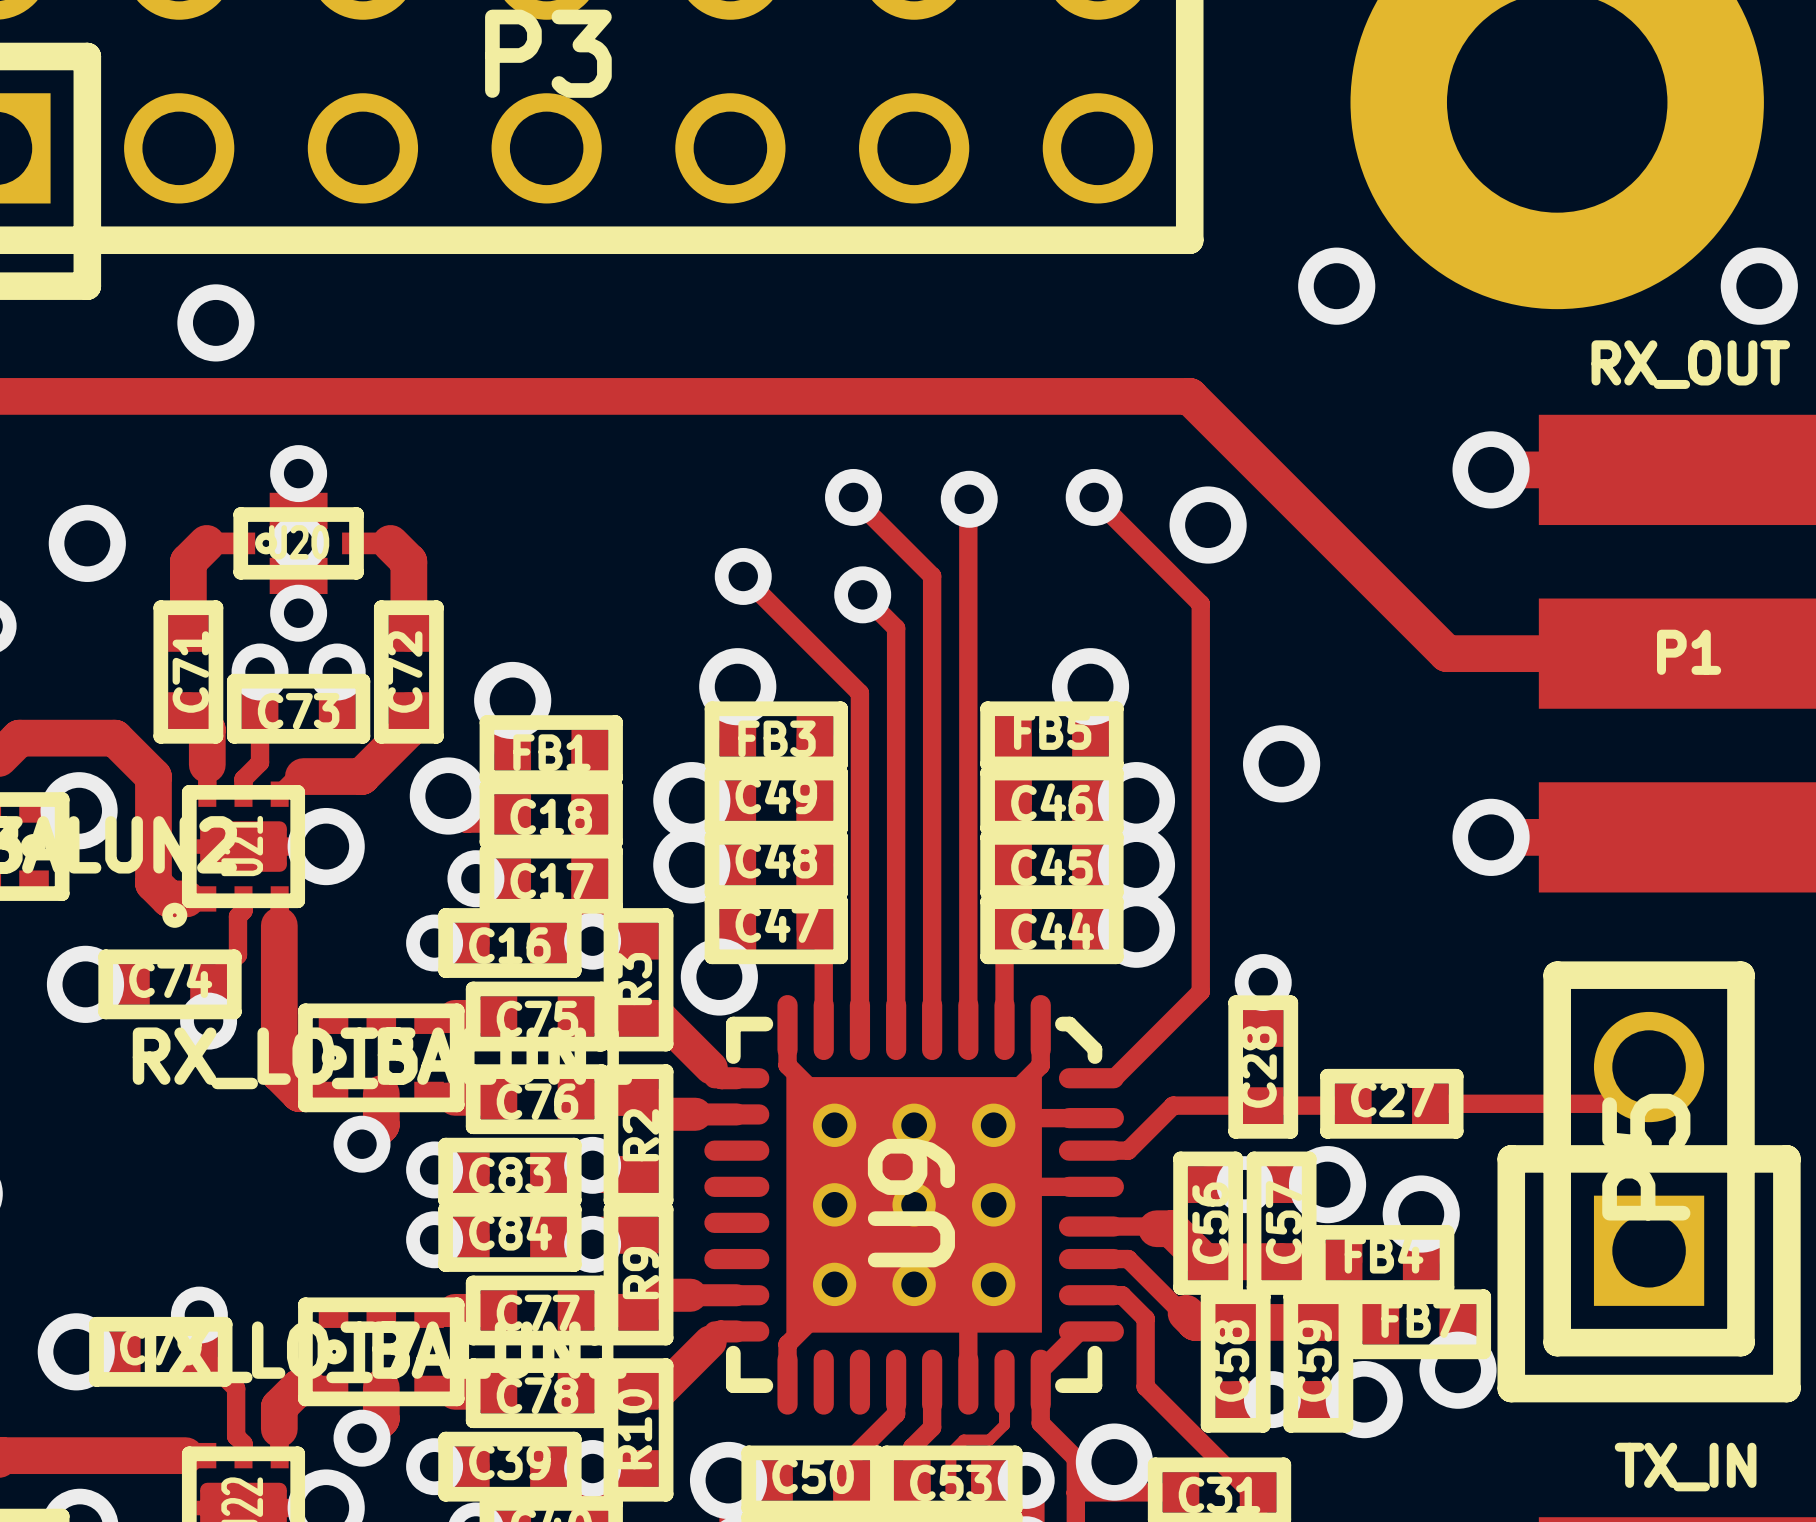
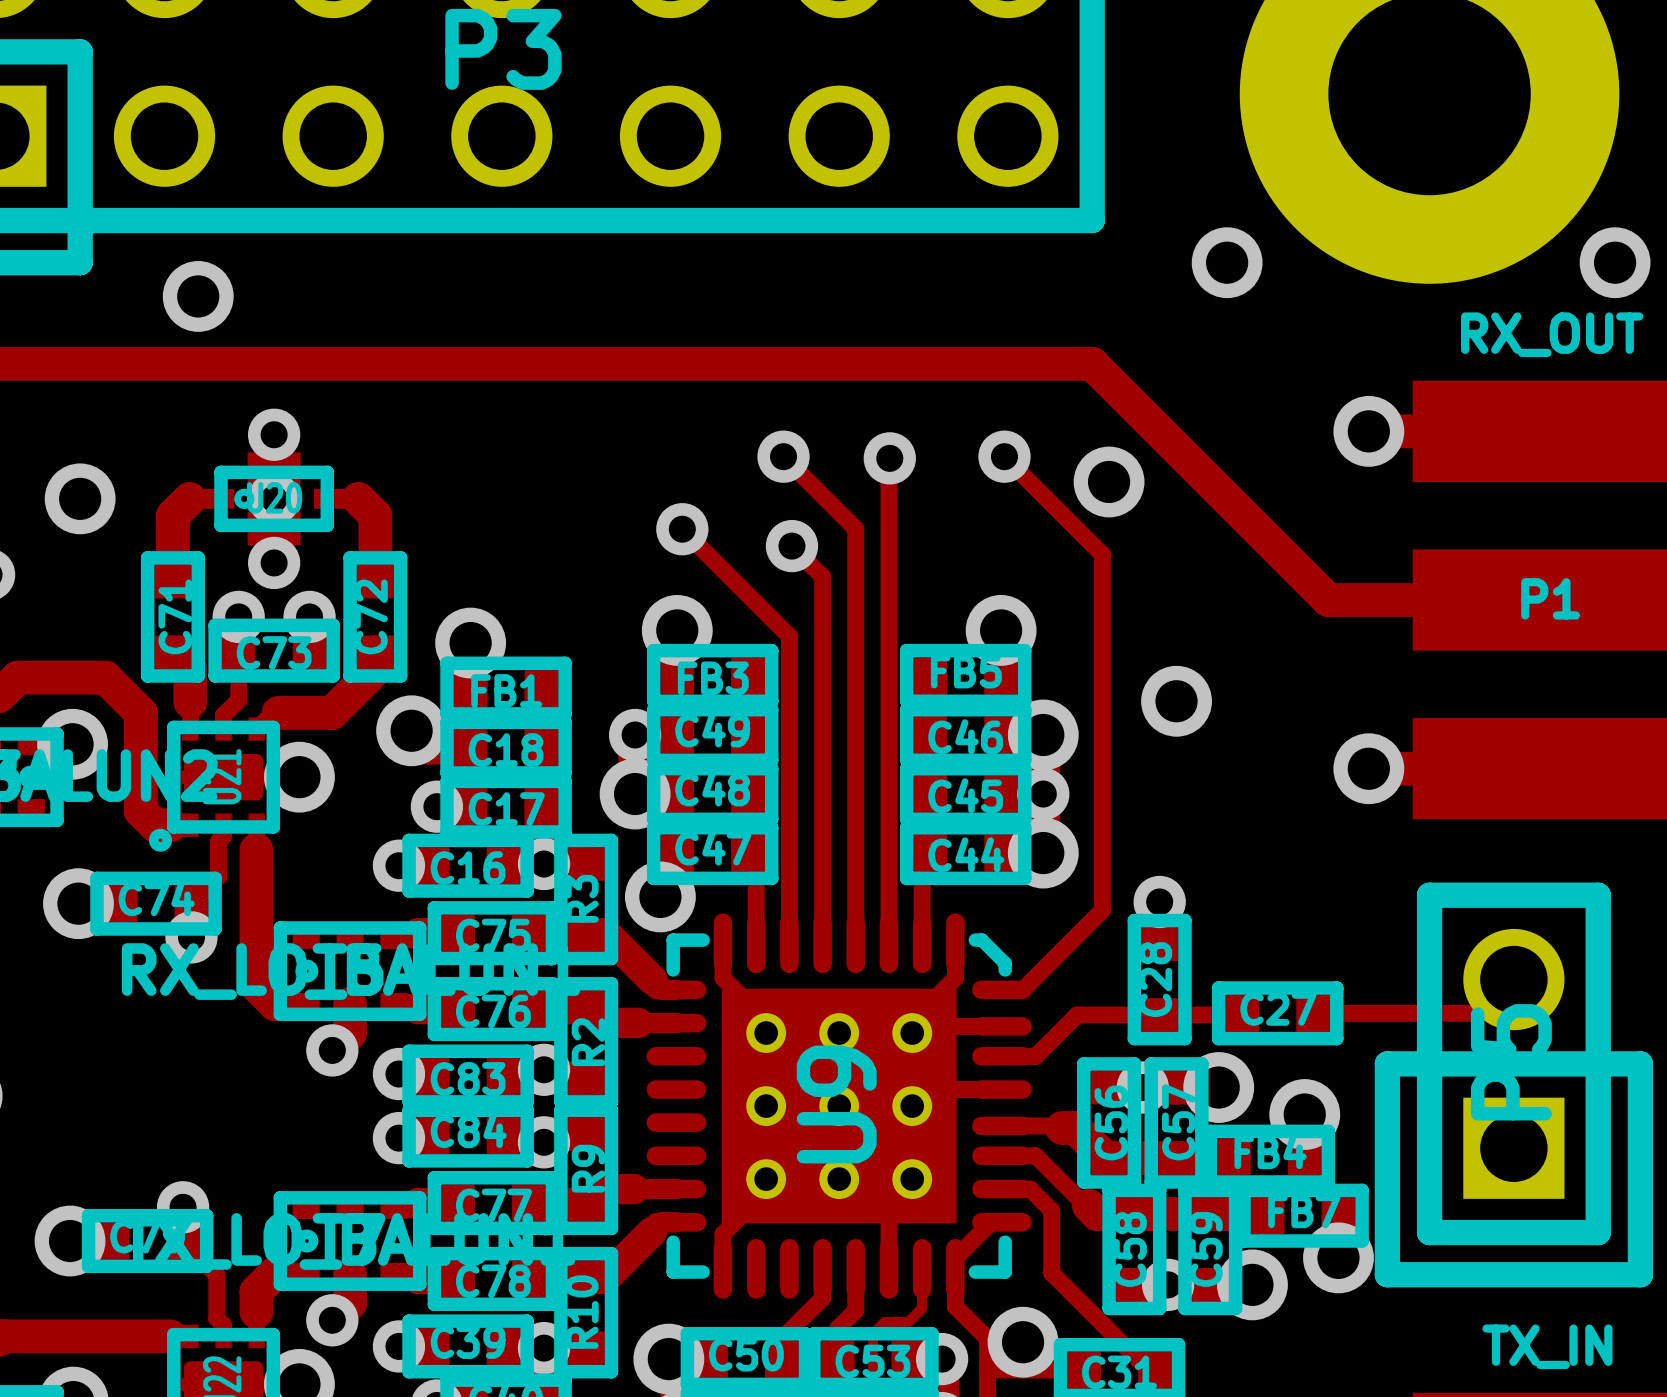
via size: [653, 762, 731, 840] -> [608, 708, 662, 762]
via size: [1097, 826, 1176, 904] -> [1017, 767, 1070, 821]

